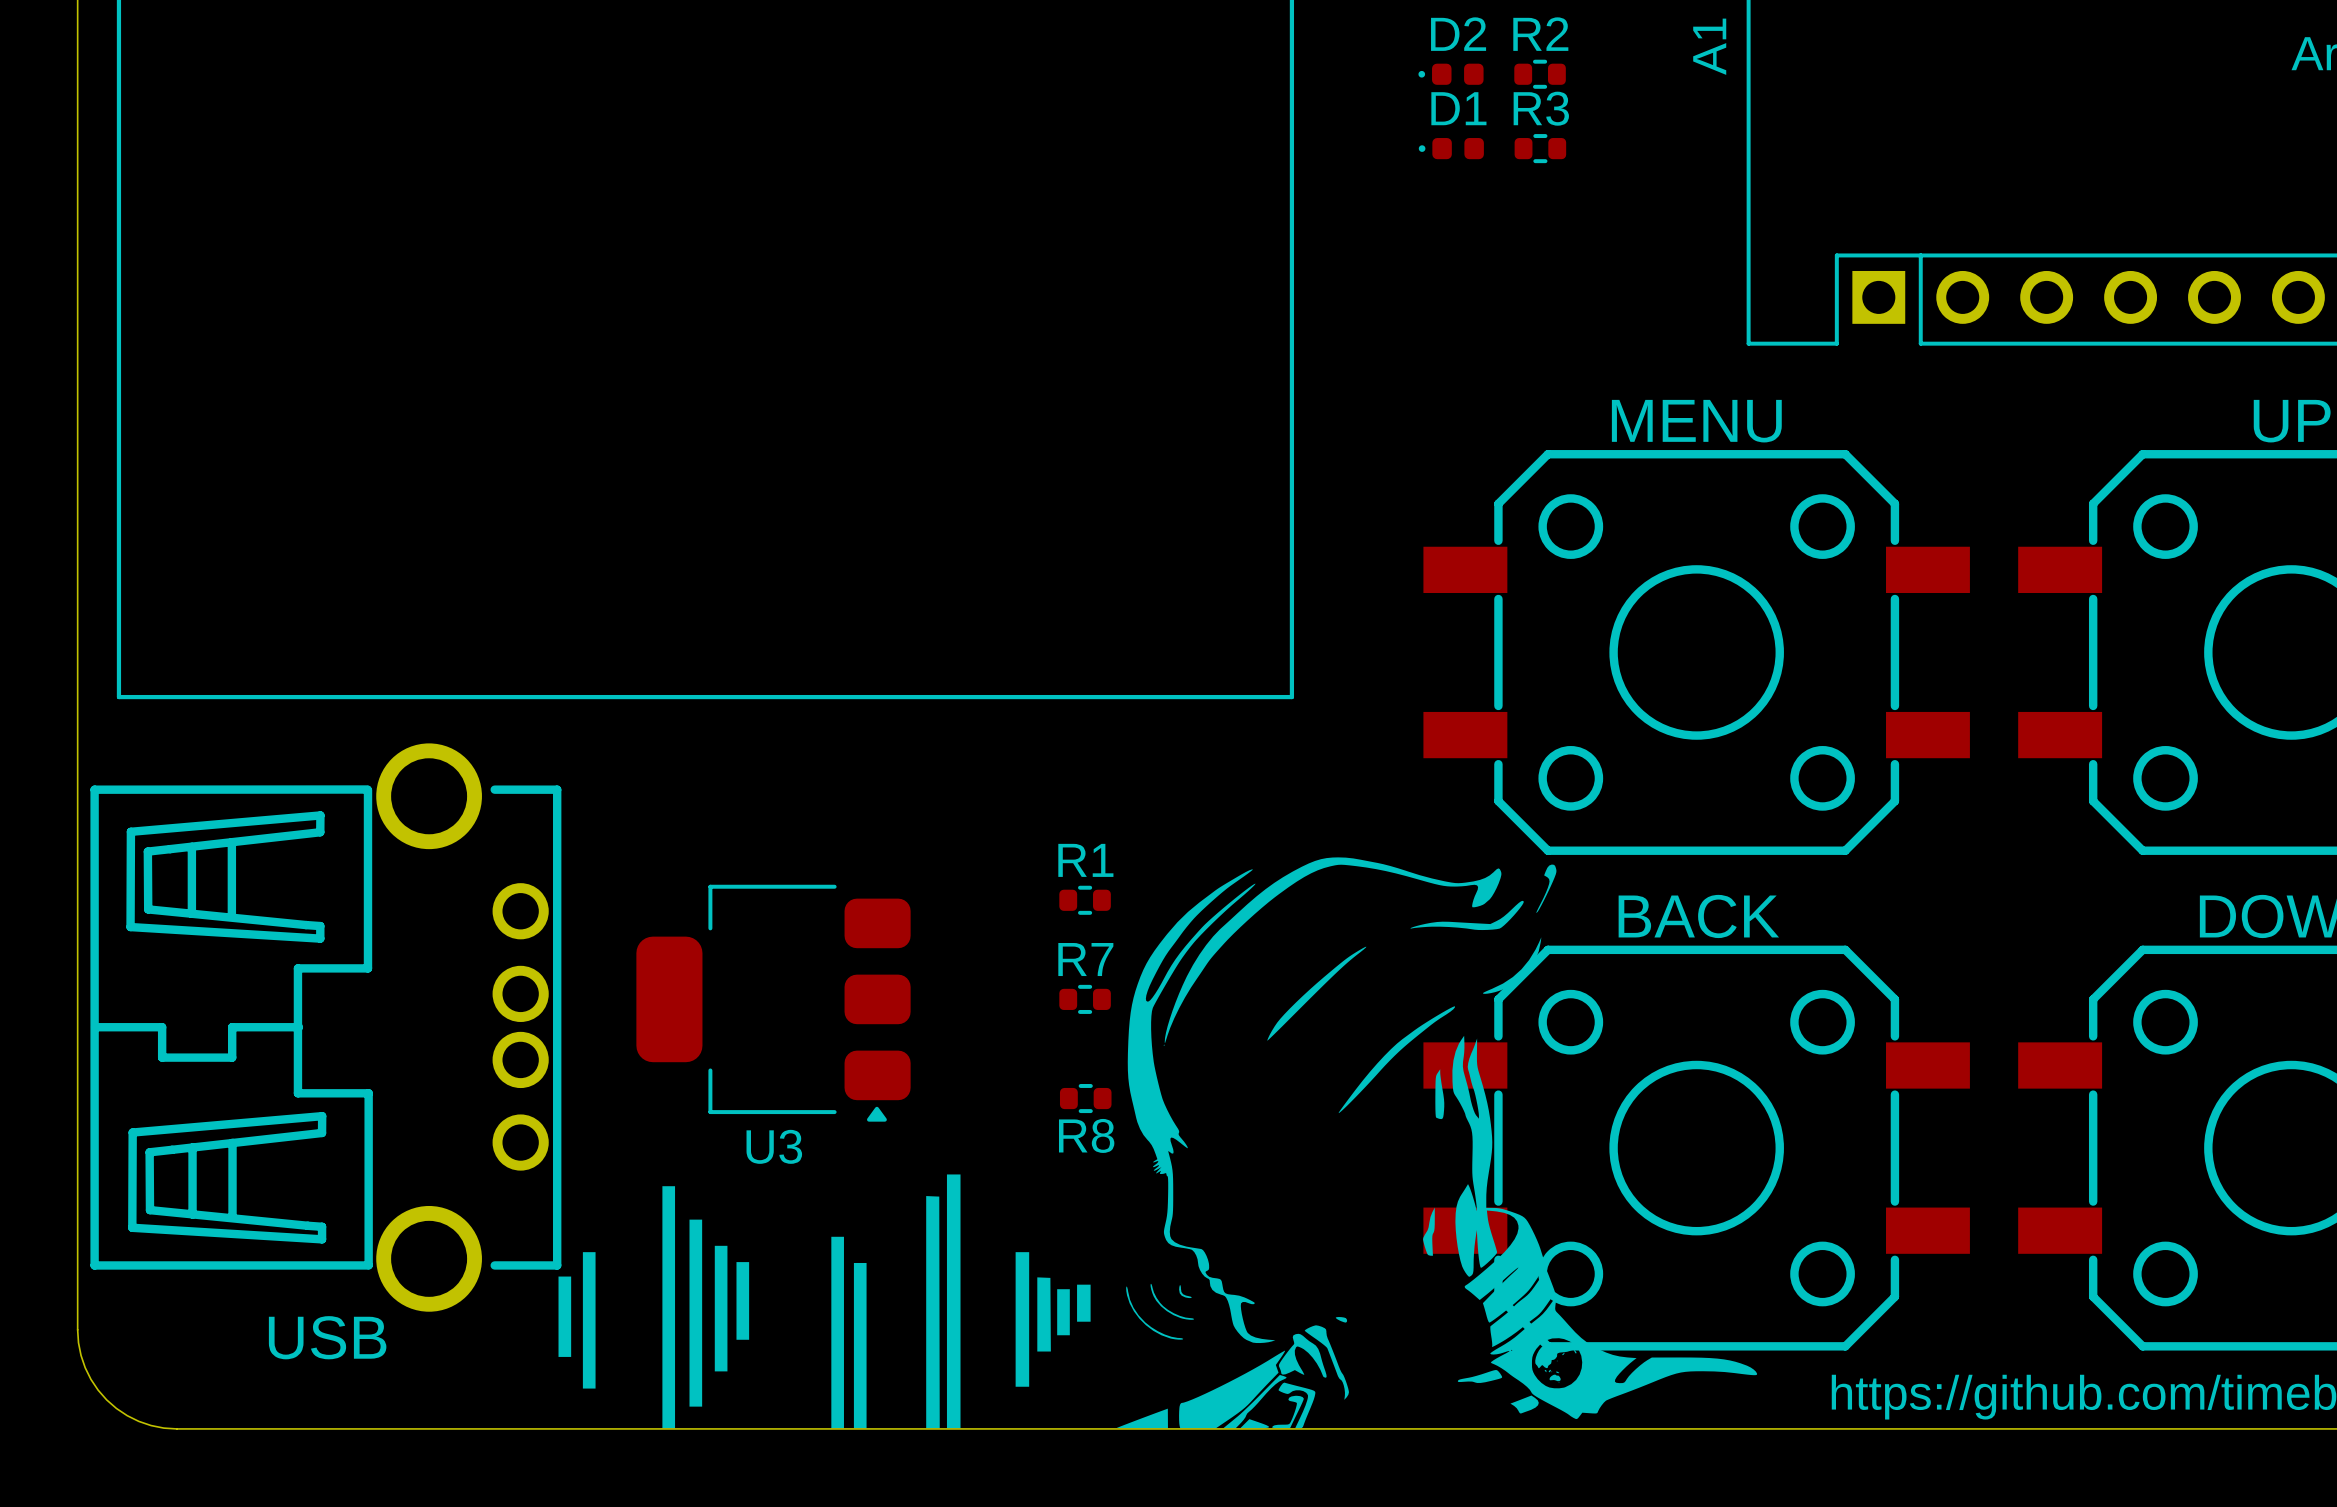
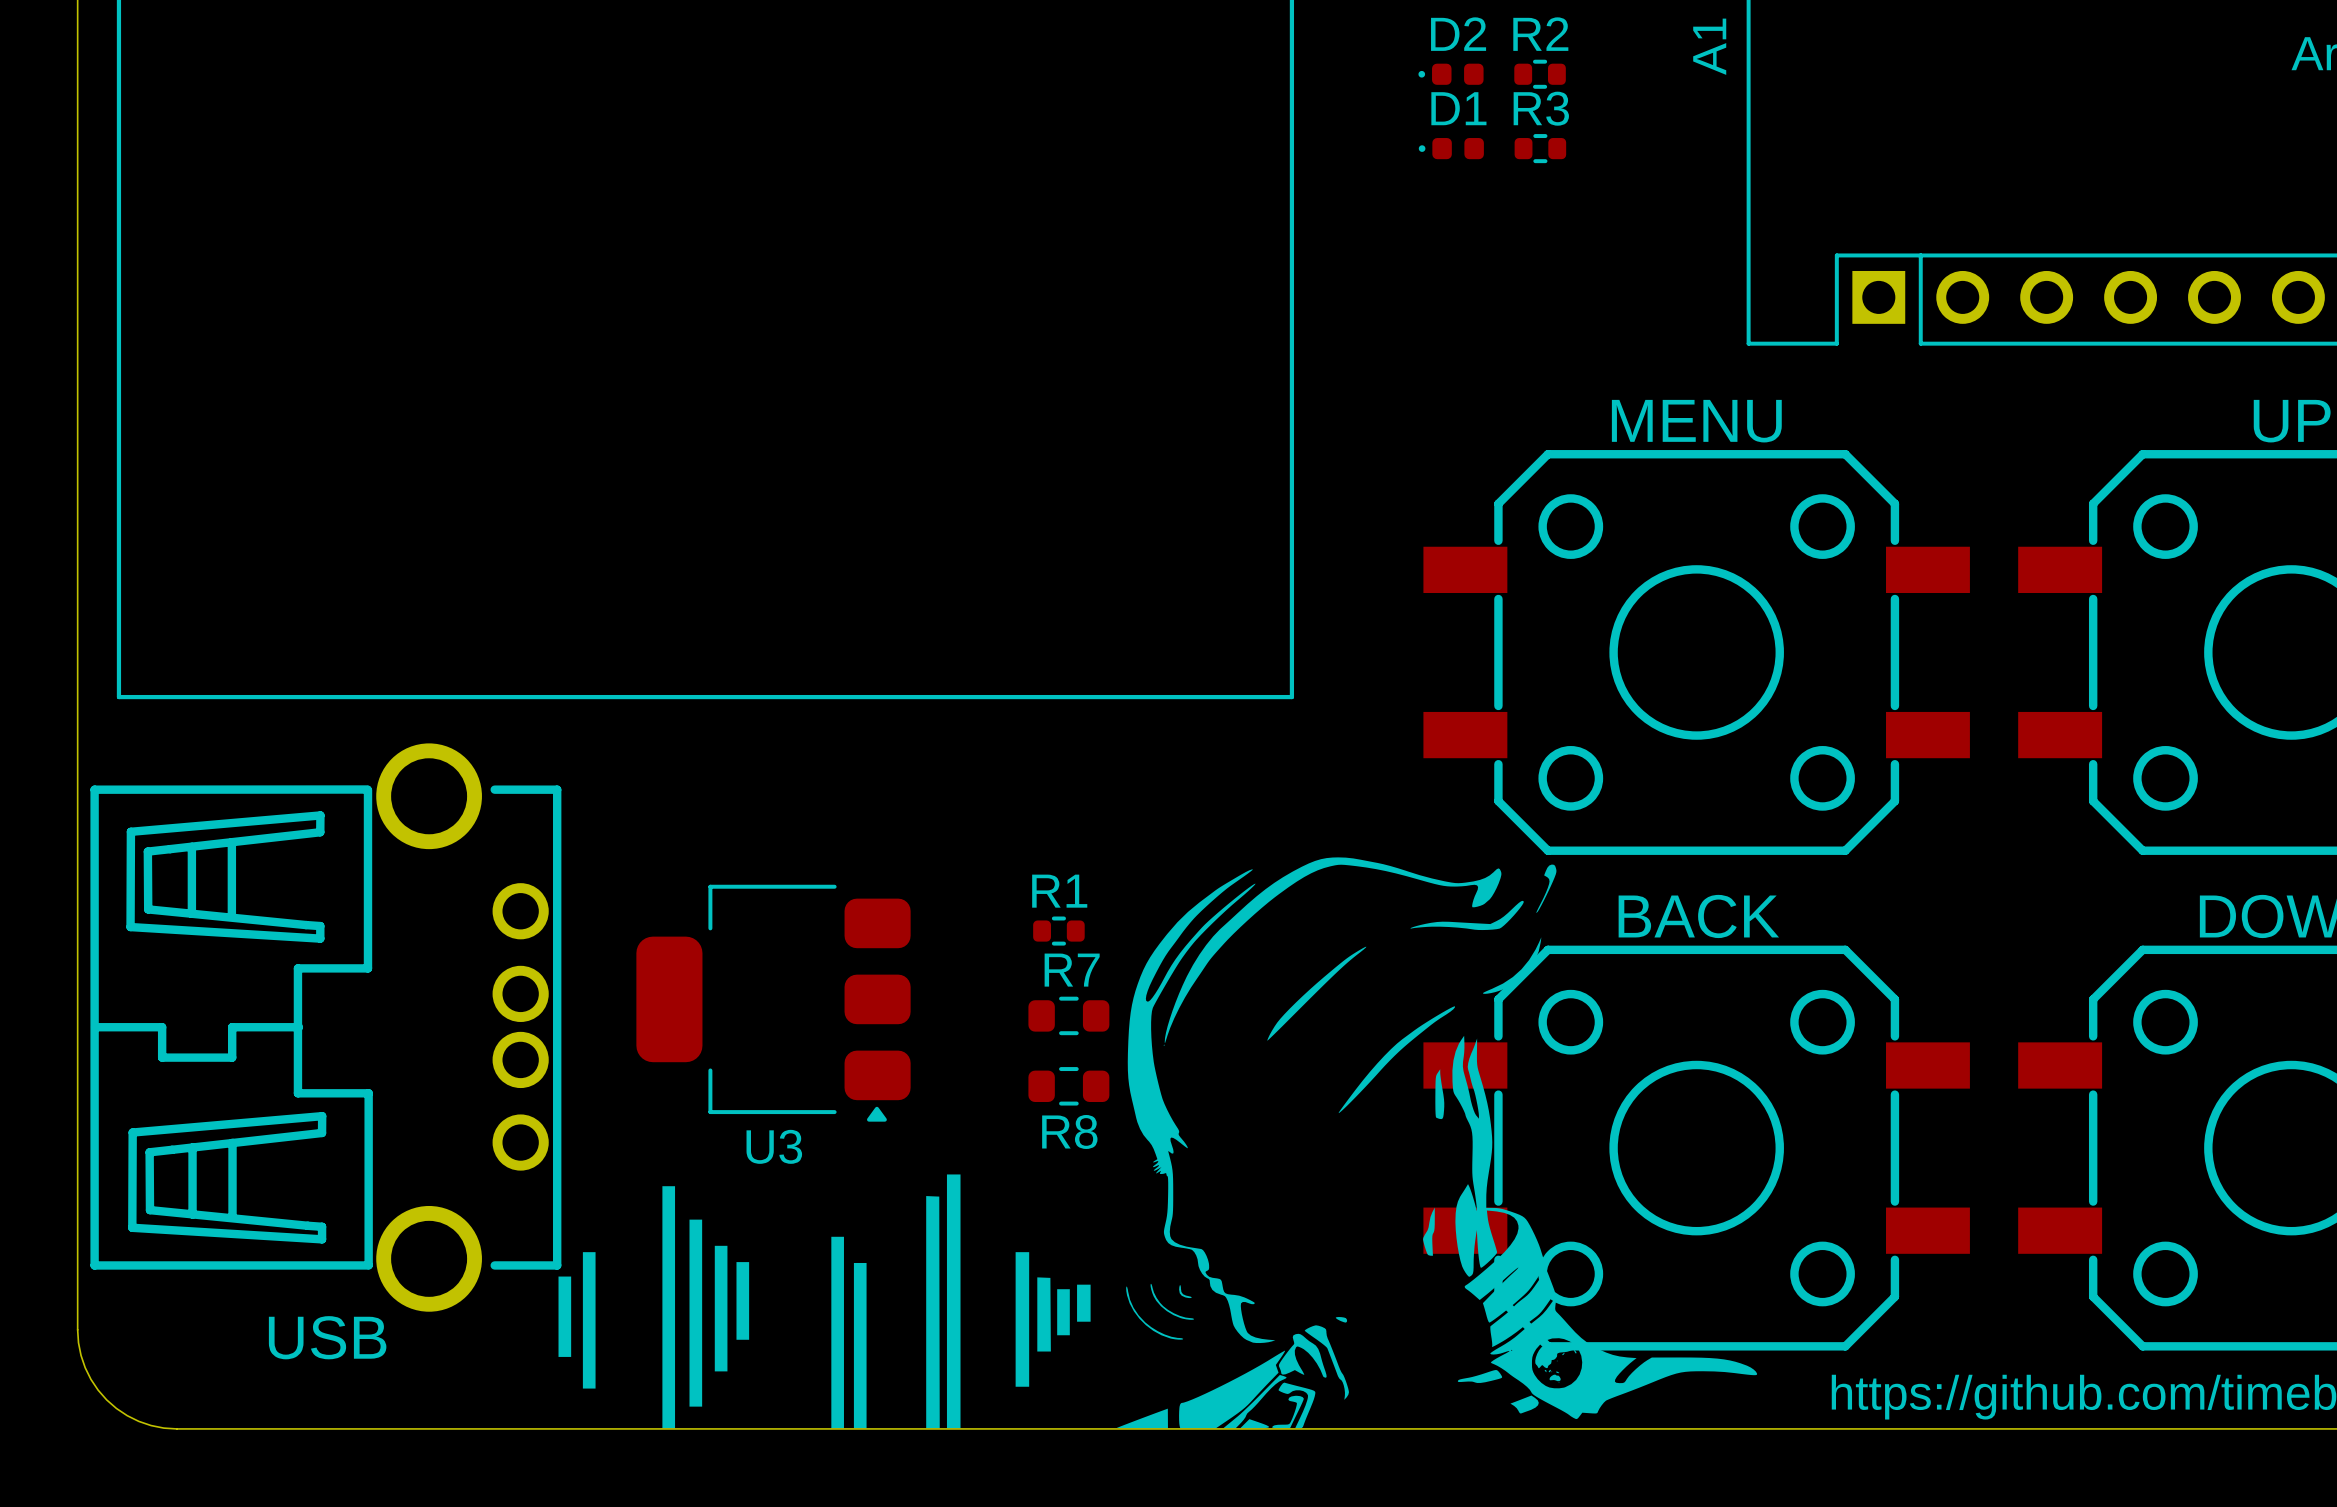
R1 position: (1085, 900) -> (1058, 931)
R7 footprint: [1059, 984, 1111, 1014] -> [1028, 996, 1110, 1036]
R8 footprint: [1059, 1083, 1112, 1114] -> [1028, 1067, 1110, 1106]

